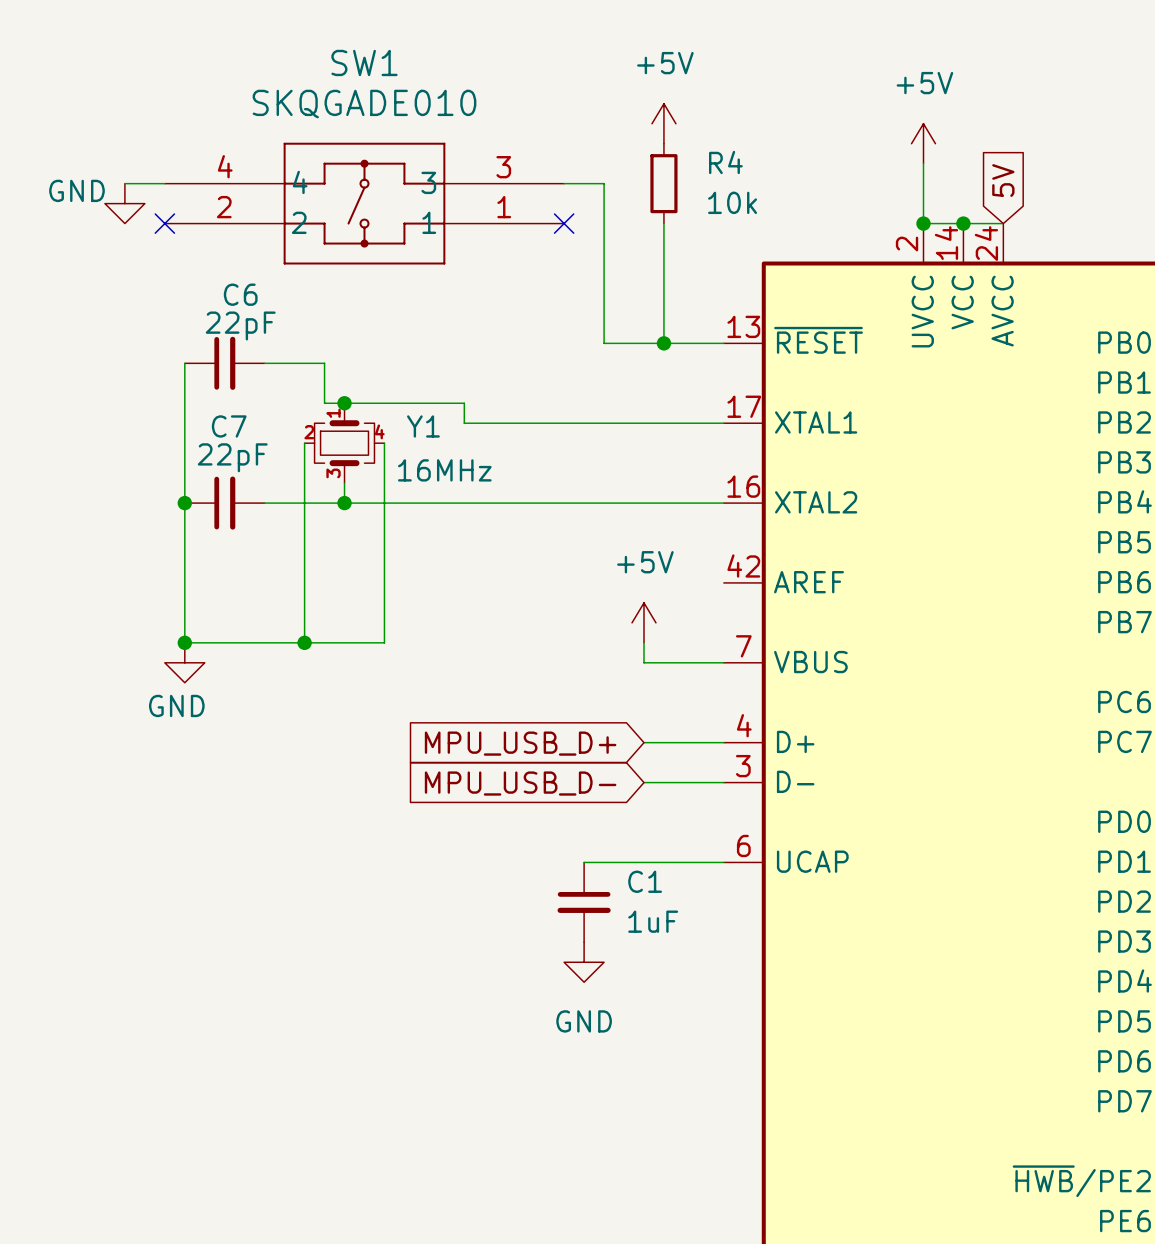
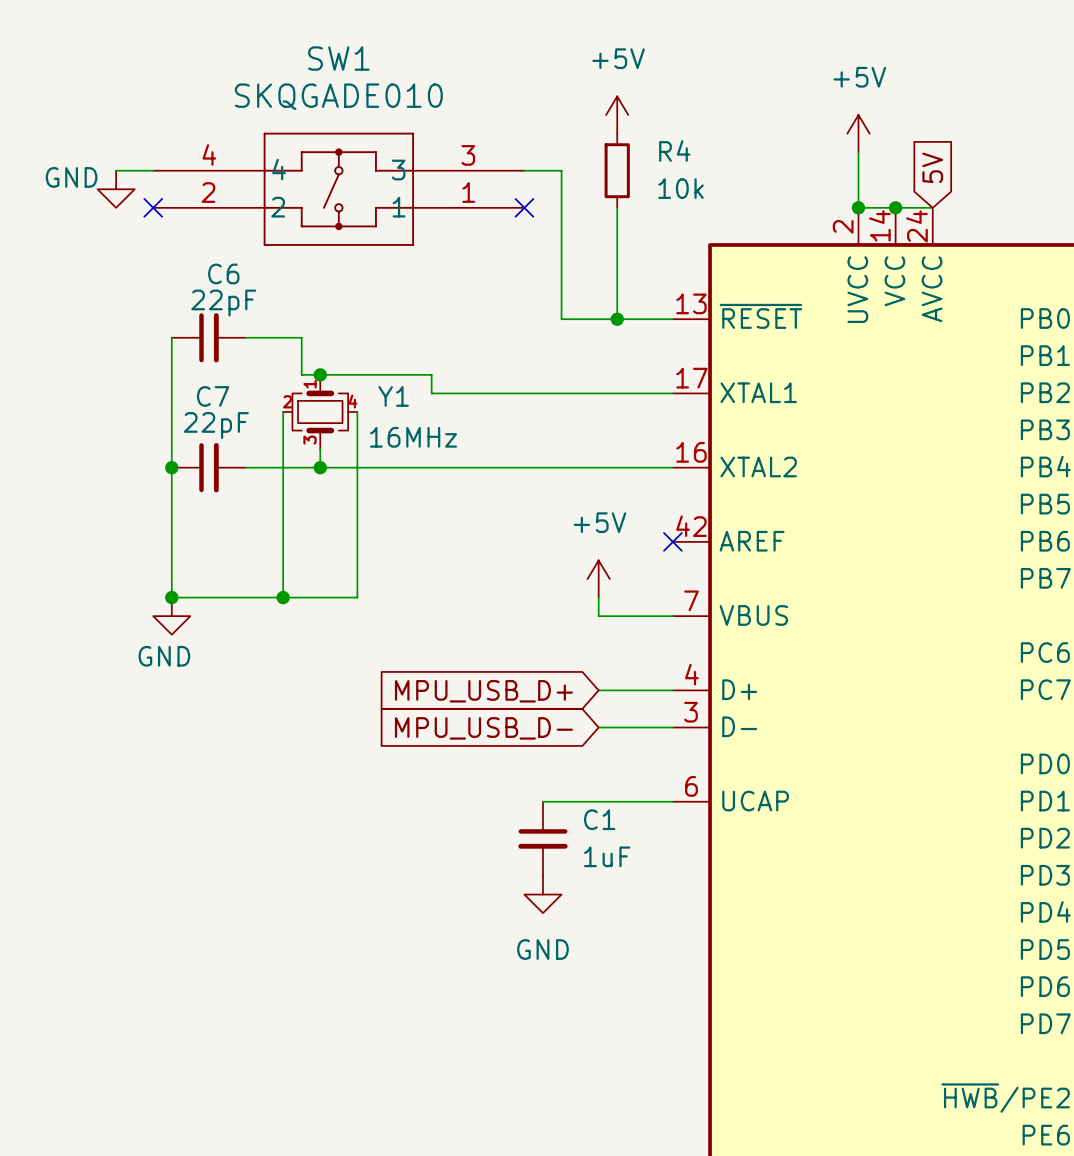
no-connect mark: none -> (672, 541)

